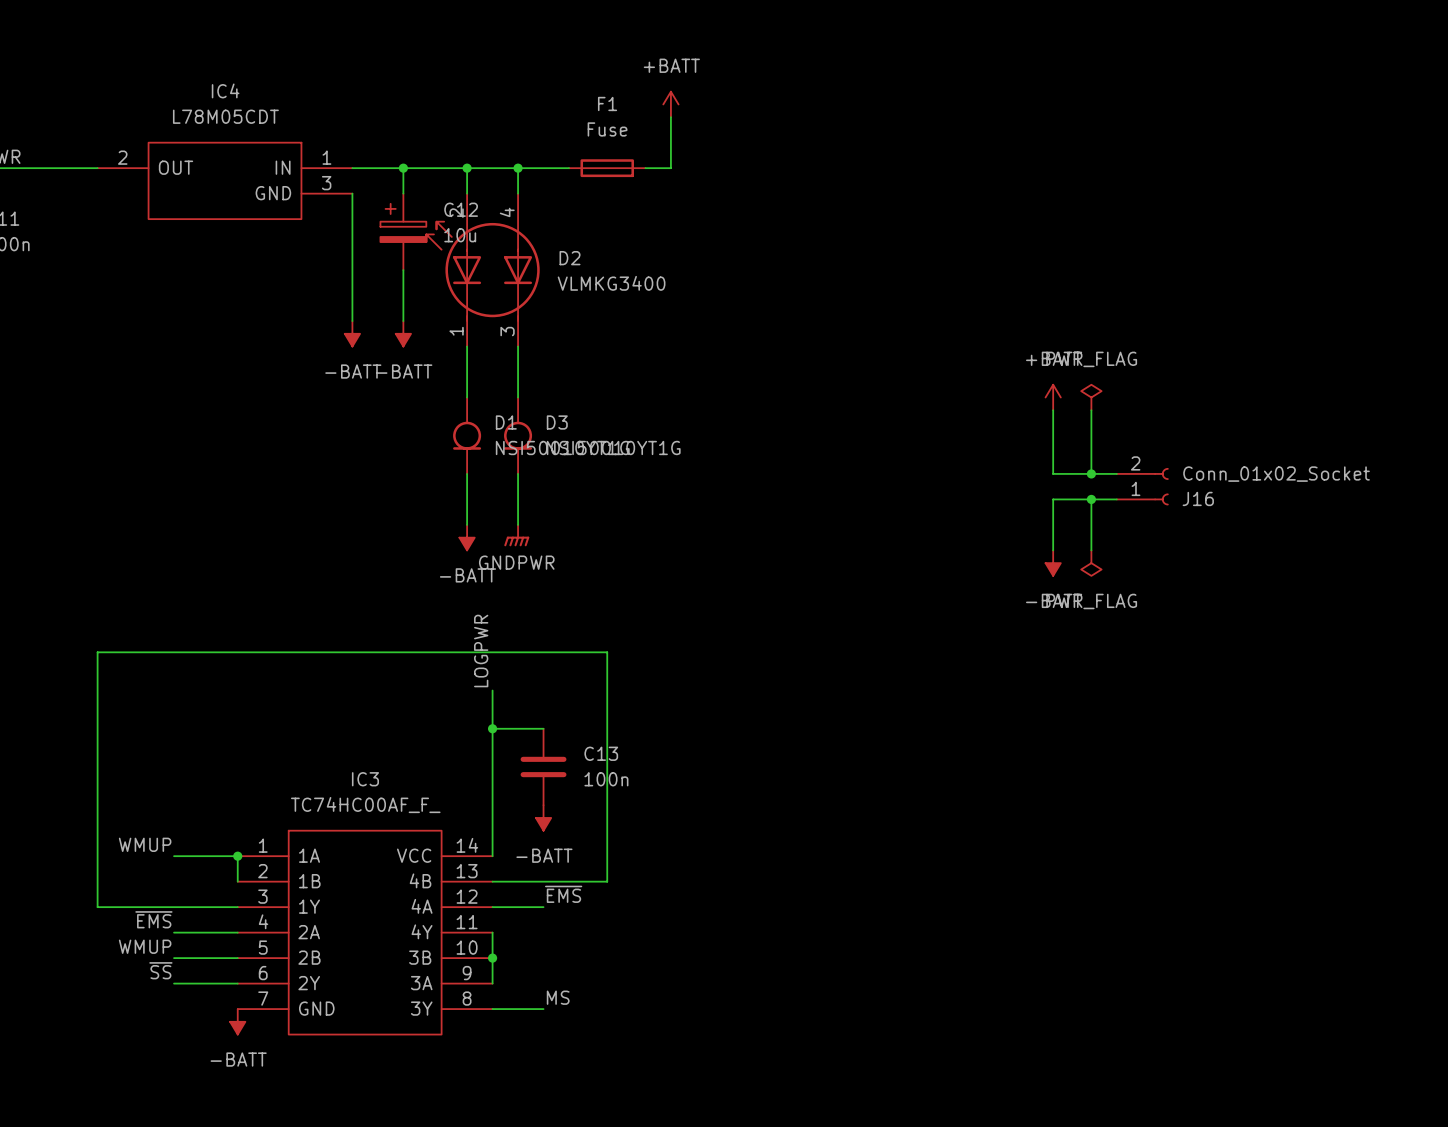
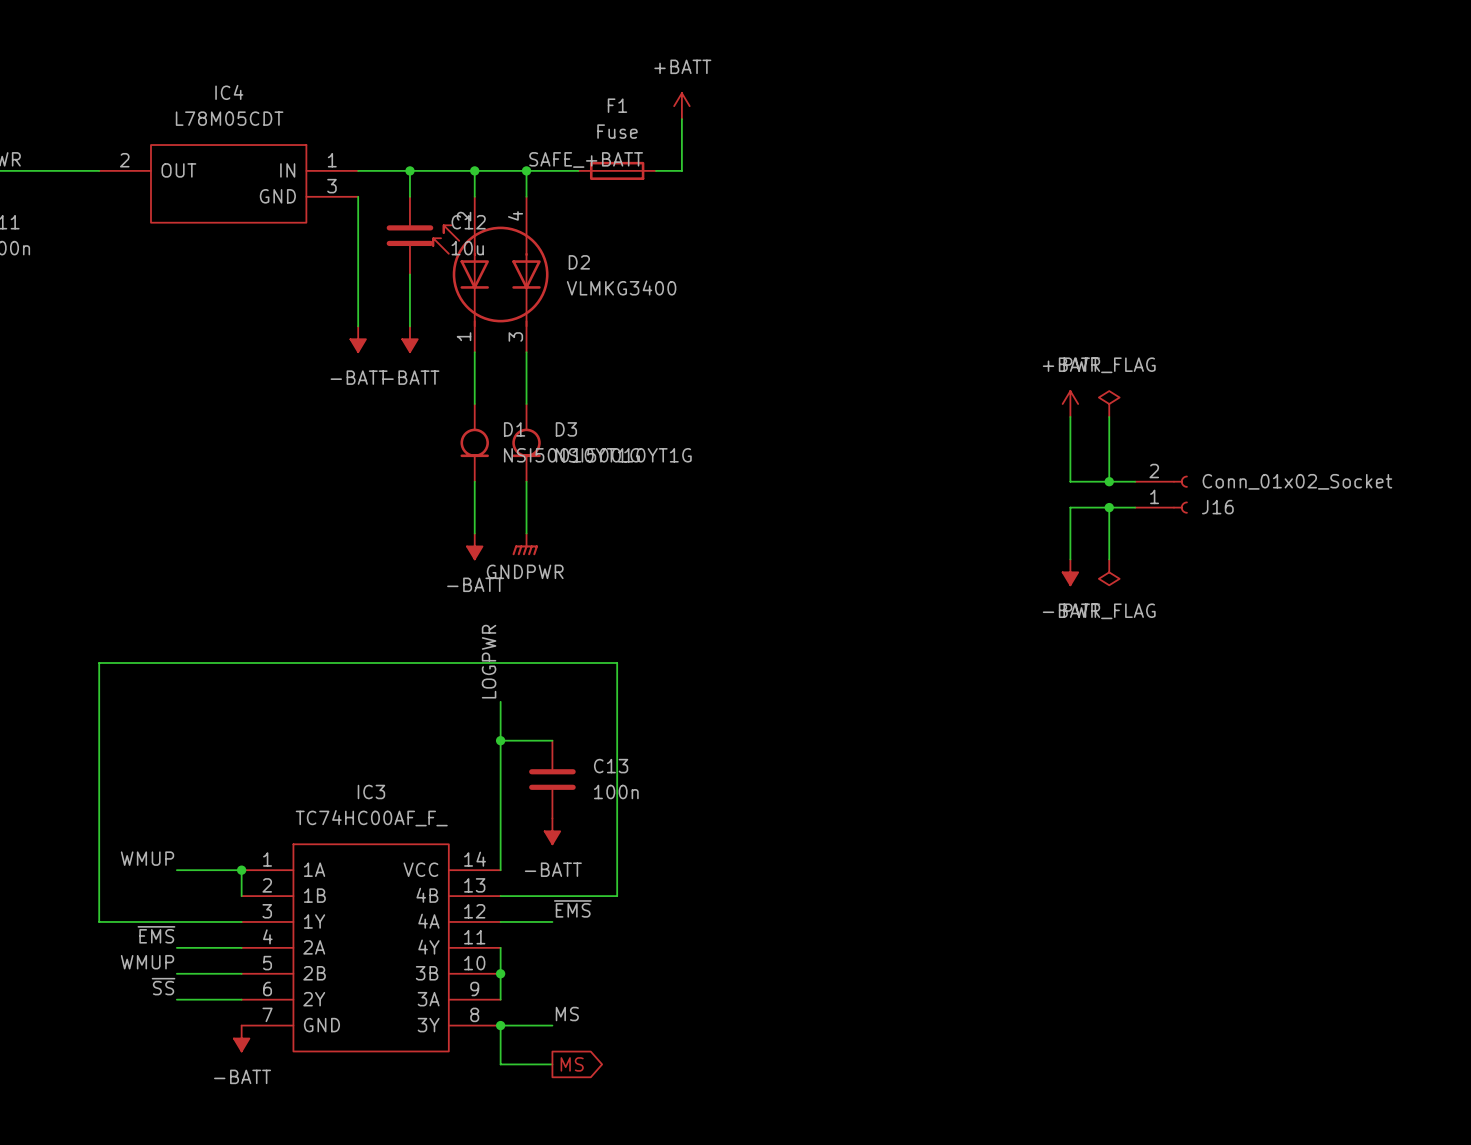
label: none -> SAFE_+BATT (586, 159)
C12 symbol: [380, 193, 427, 271] -> [386, 196, 434, 275]
wire: none -> (500, 1025) (500, 1064) (552, 1064)
junction: none -> (500, 1025)
global label: none -> MS (572, 1064)

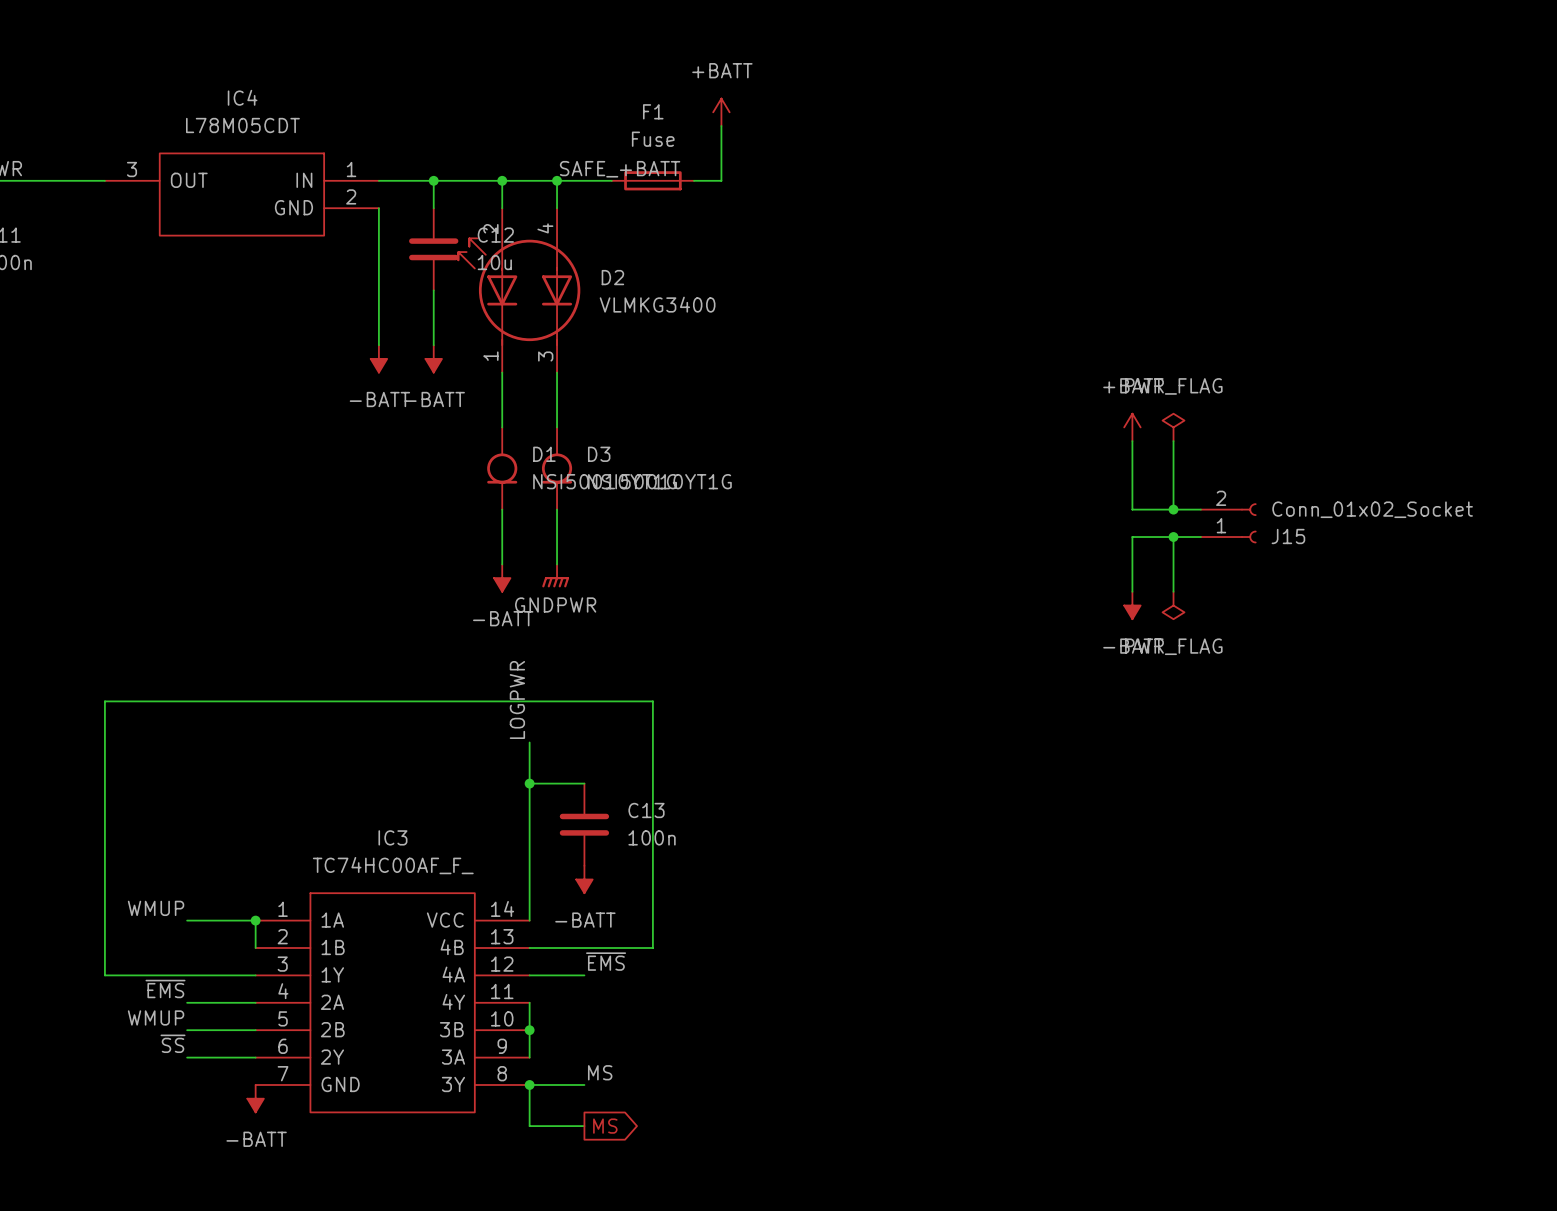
IC4 pin number: 2 (124, 160) -> 3 (132, 169)
IC4 pin number: 3 (331, 186) -> 2 (351, 196)
J16 name: J16 (1217, 507) -> J15 (1288, 536)

